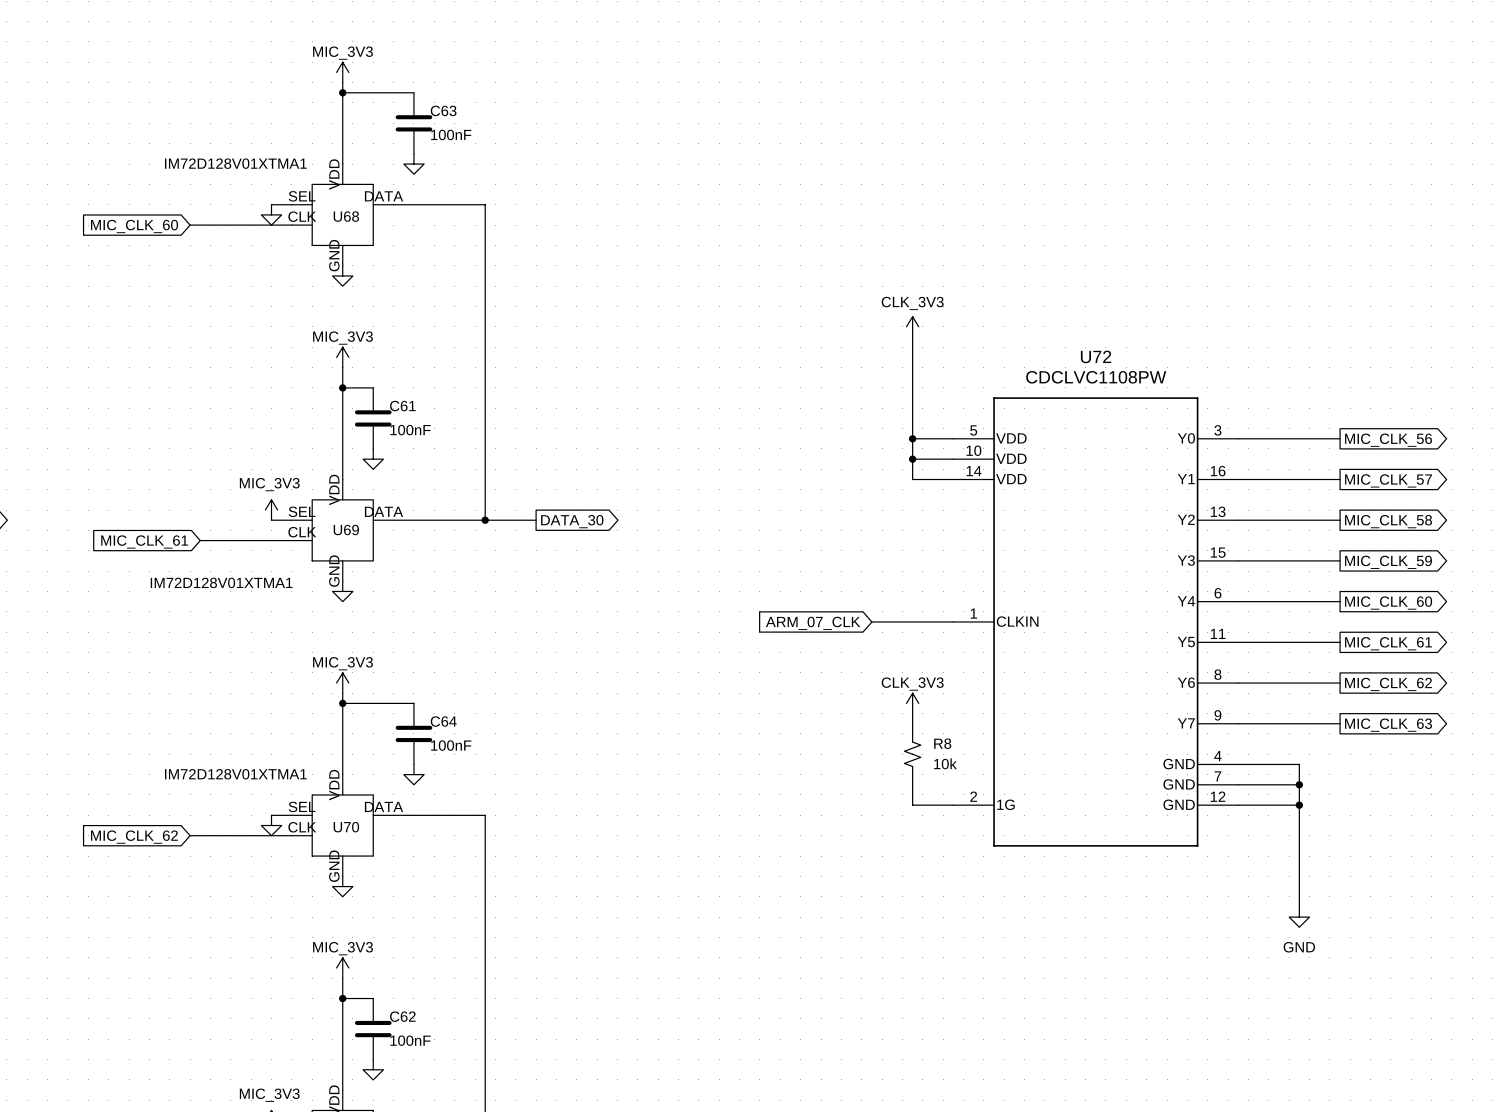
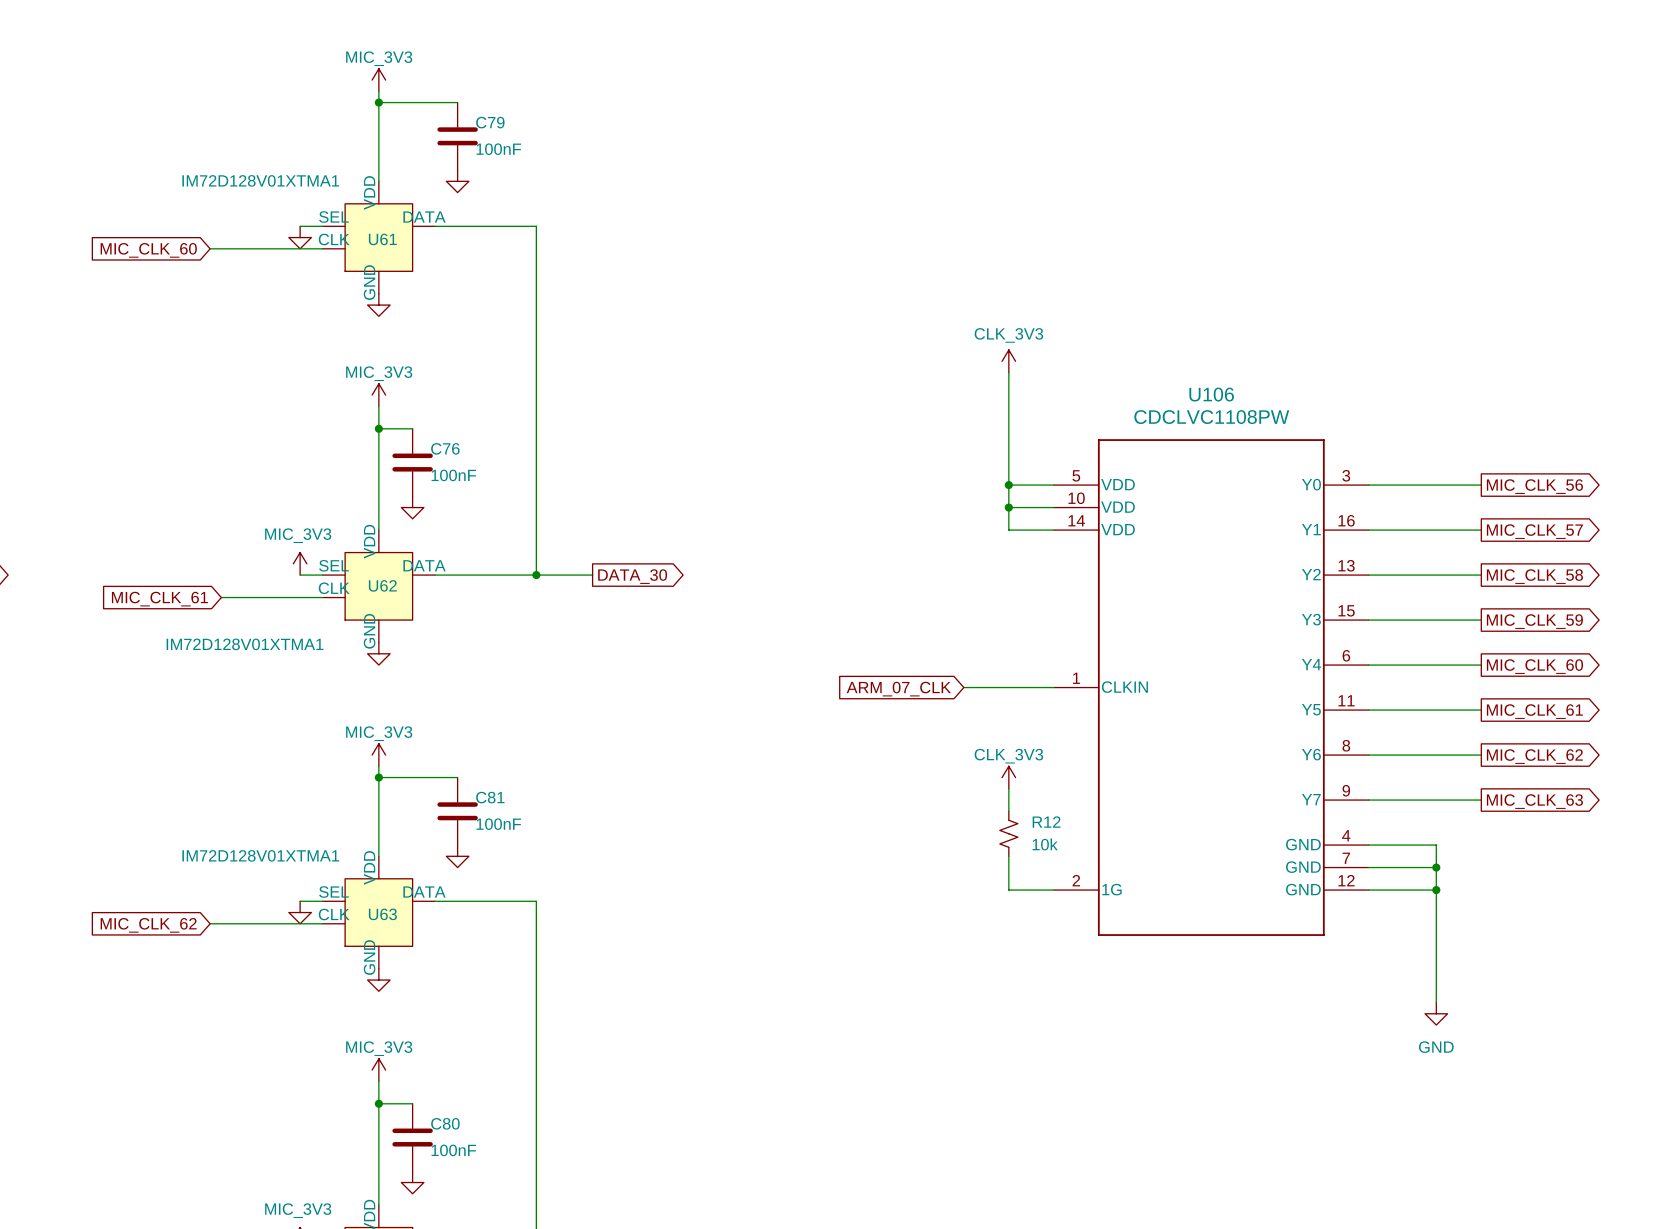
C63 name: C63 (443, 110) -> C79 (490, 122)
U68 name: U68 (346, 216) -> U61 (382, 239)
U72 name: U72 (1096, 356) -> U106 (1211, 394)
C61 name: C61 (402, 406) -> C76 (445, 448)
U69 name: U69 (346, 530) -> U62 (382, 585)
C64 name: C64 (443, 721) -> C81 (490, 797)
R8 name: R8 (942, 743) -> R12 (1046, 822)
U70 name: U70 (346, 827) -> U63 (382, 914)
C62 name: C62 (402, 1016) -> C80 (445, 1123)

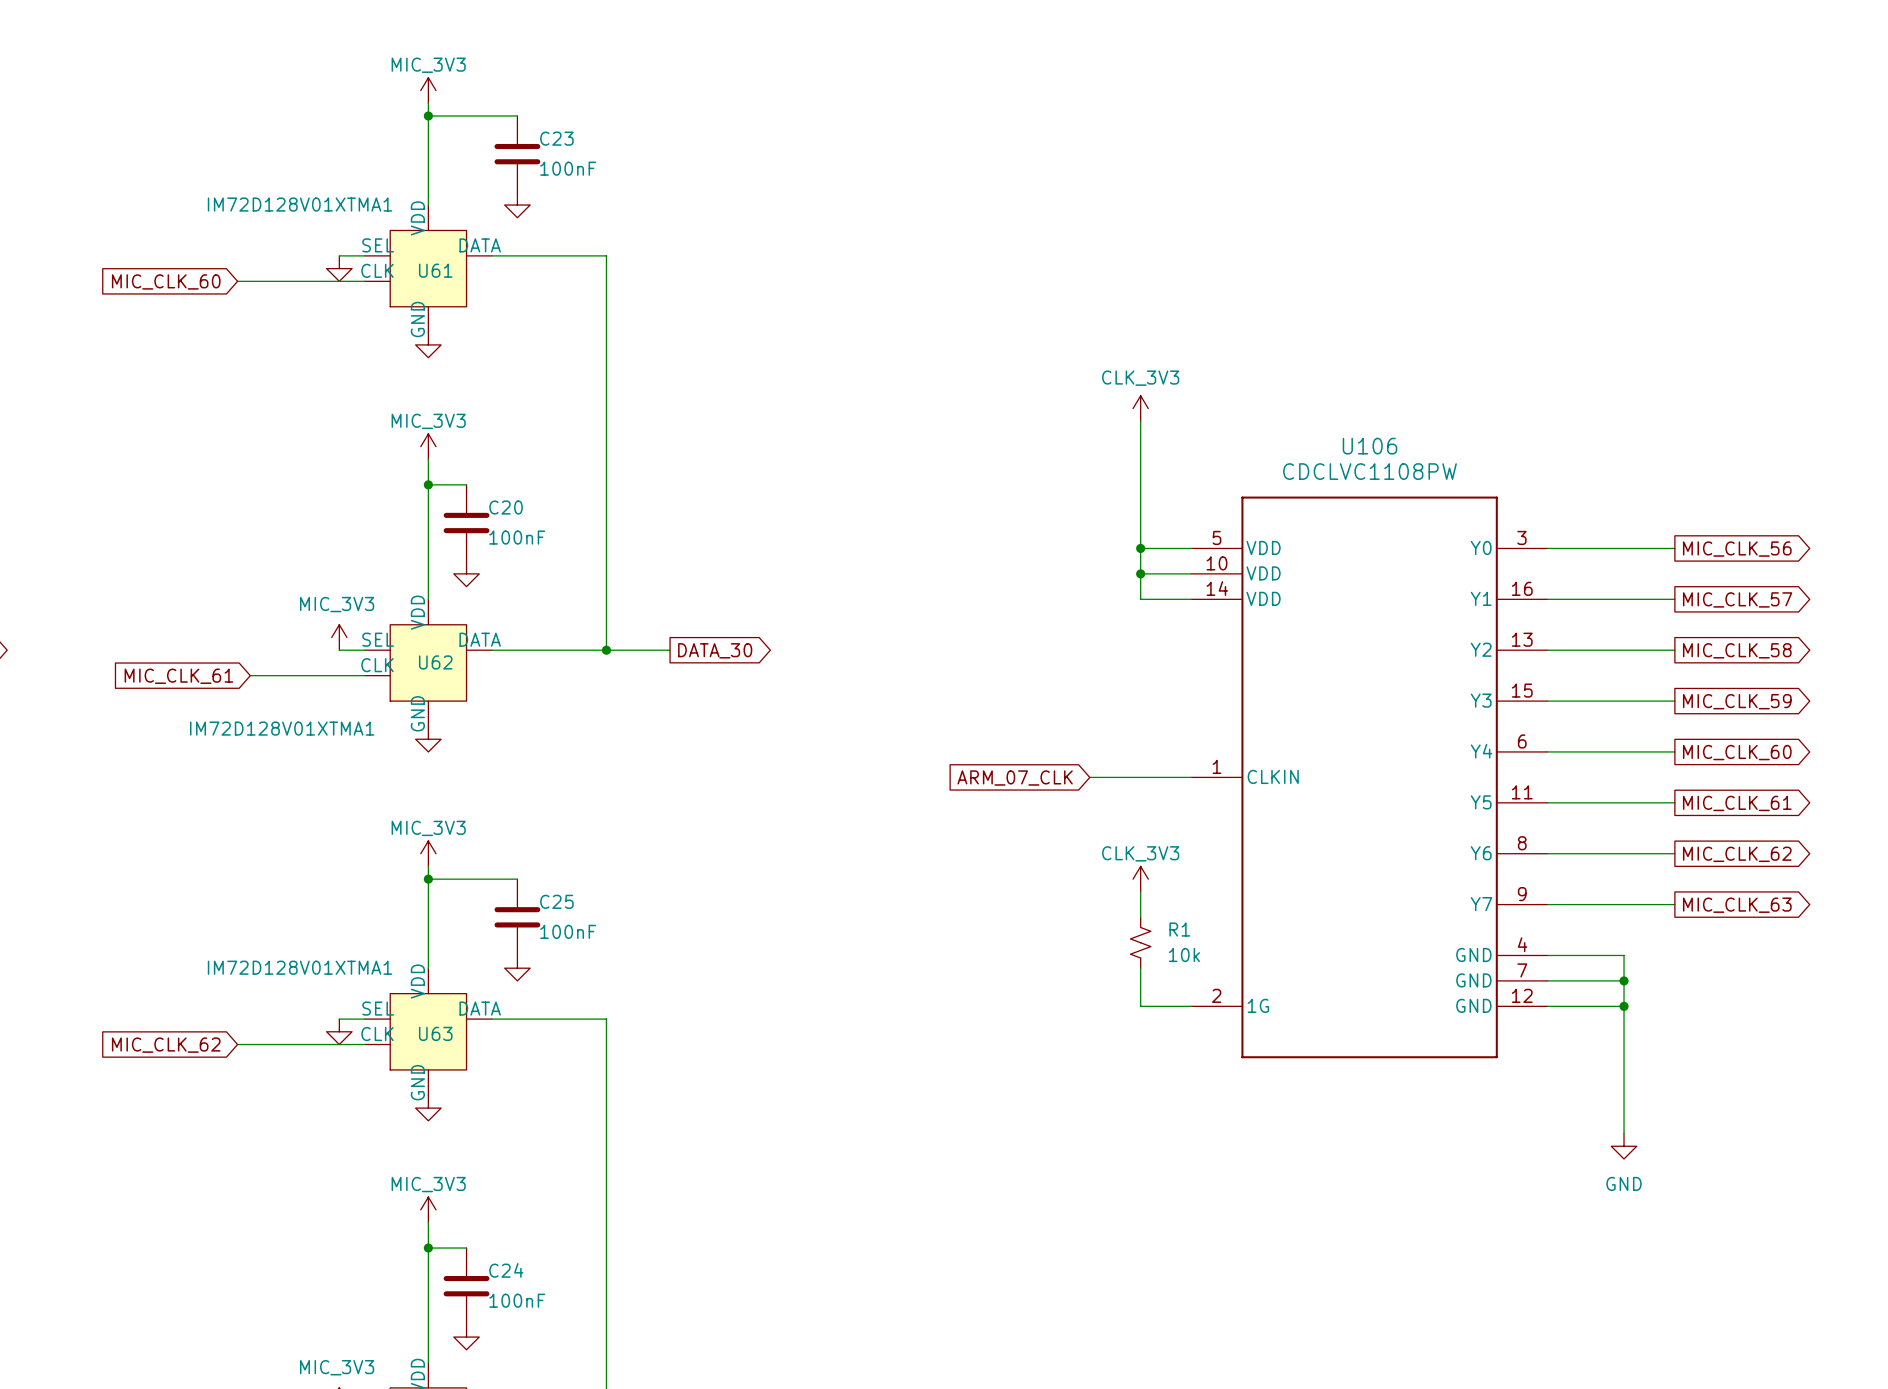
C79 name: C79 (490, 122) -> C23 (556, 138)
C76 name: C76 (445, 448) -> C20 (506, 507)
C81 name: C81 (490, 797) -> C25 (556, 901)
R12 name: R12 (1046, 822) -> R1 (1179, 929)
C80 name: C80 (445, 1123) -> C24 (506, 1270)

